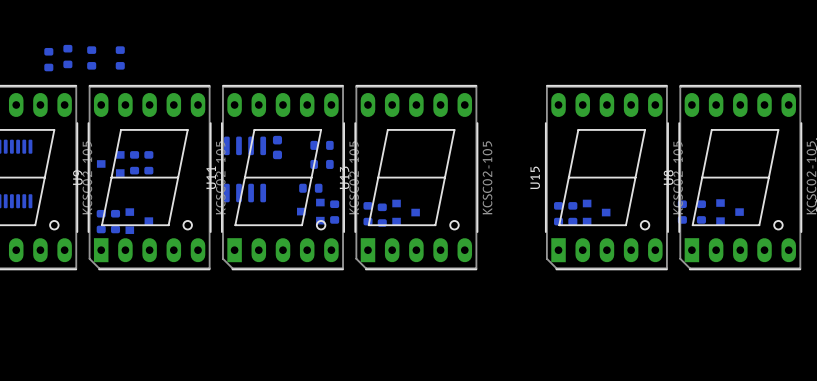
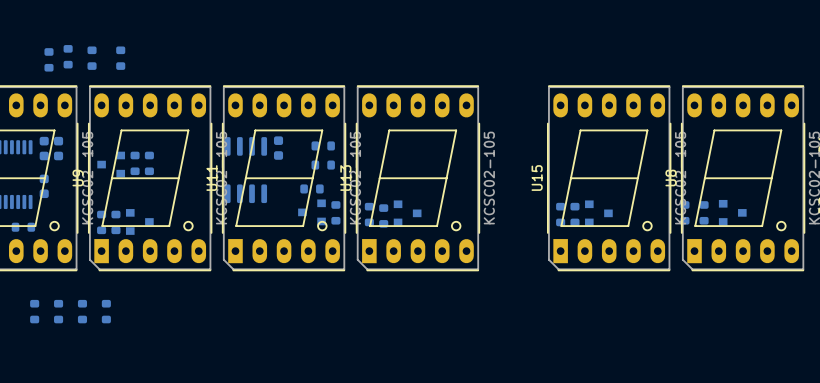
part: none -> (44, 148)
part: none -> (58, 148)
part: none -> (44, 186)
part: none -> (23, 227)
part: none -> (34, 311)
part: none -> (58, 311)
part: none -> (82, 311)
part: none -> (106, 311)

